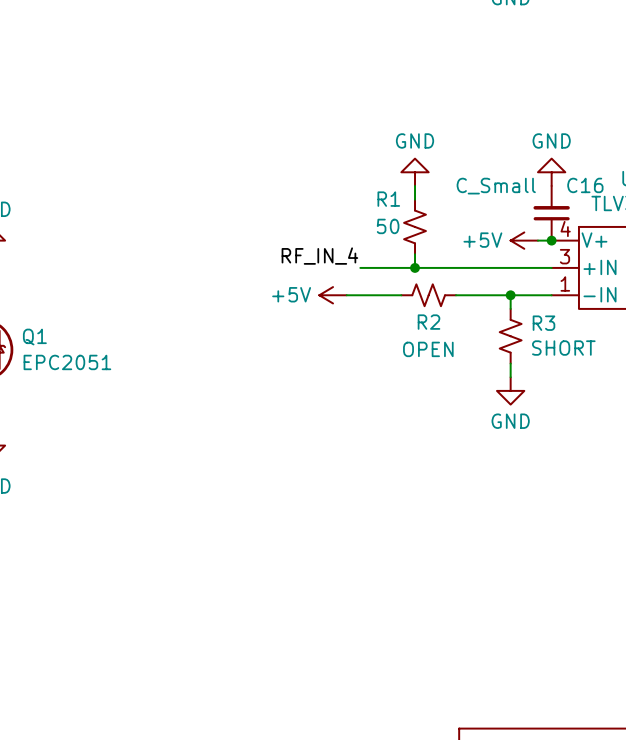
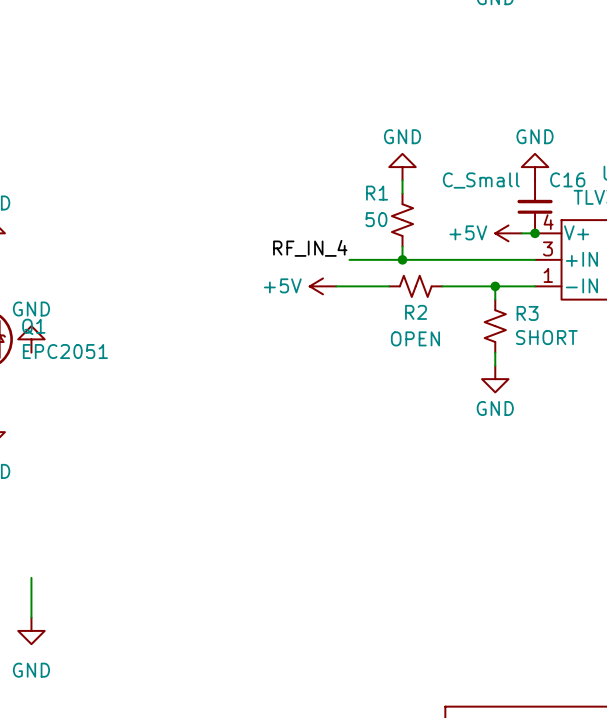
power symbol: none -> GND (31, 339)
wire: none -> (31, 577) (31, 617)
power symbol: none -> GND (31, 630)

